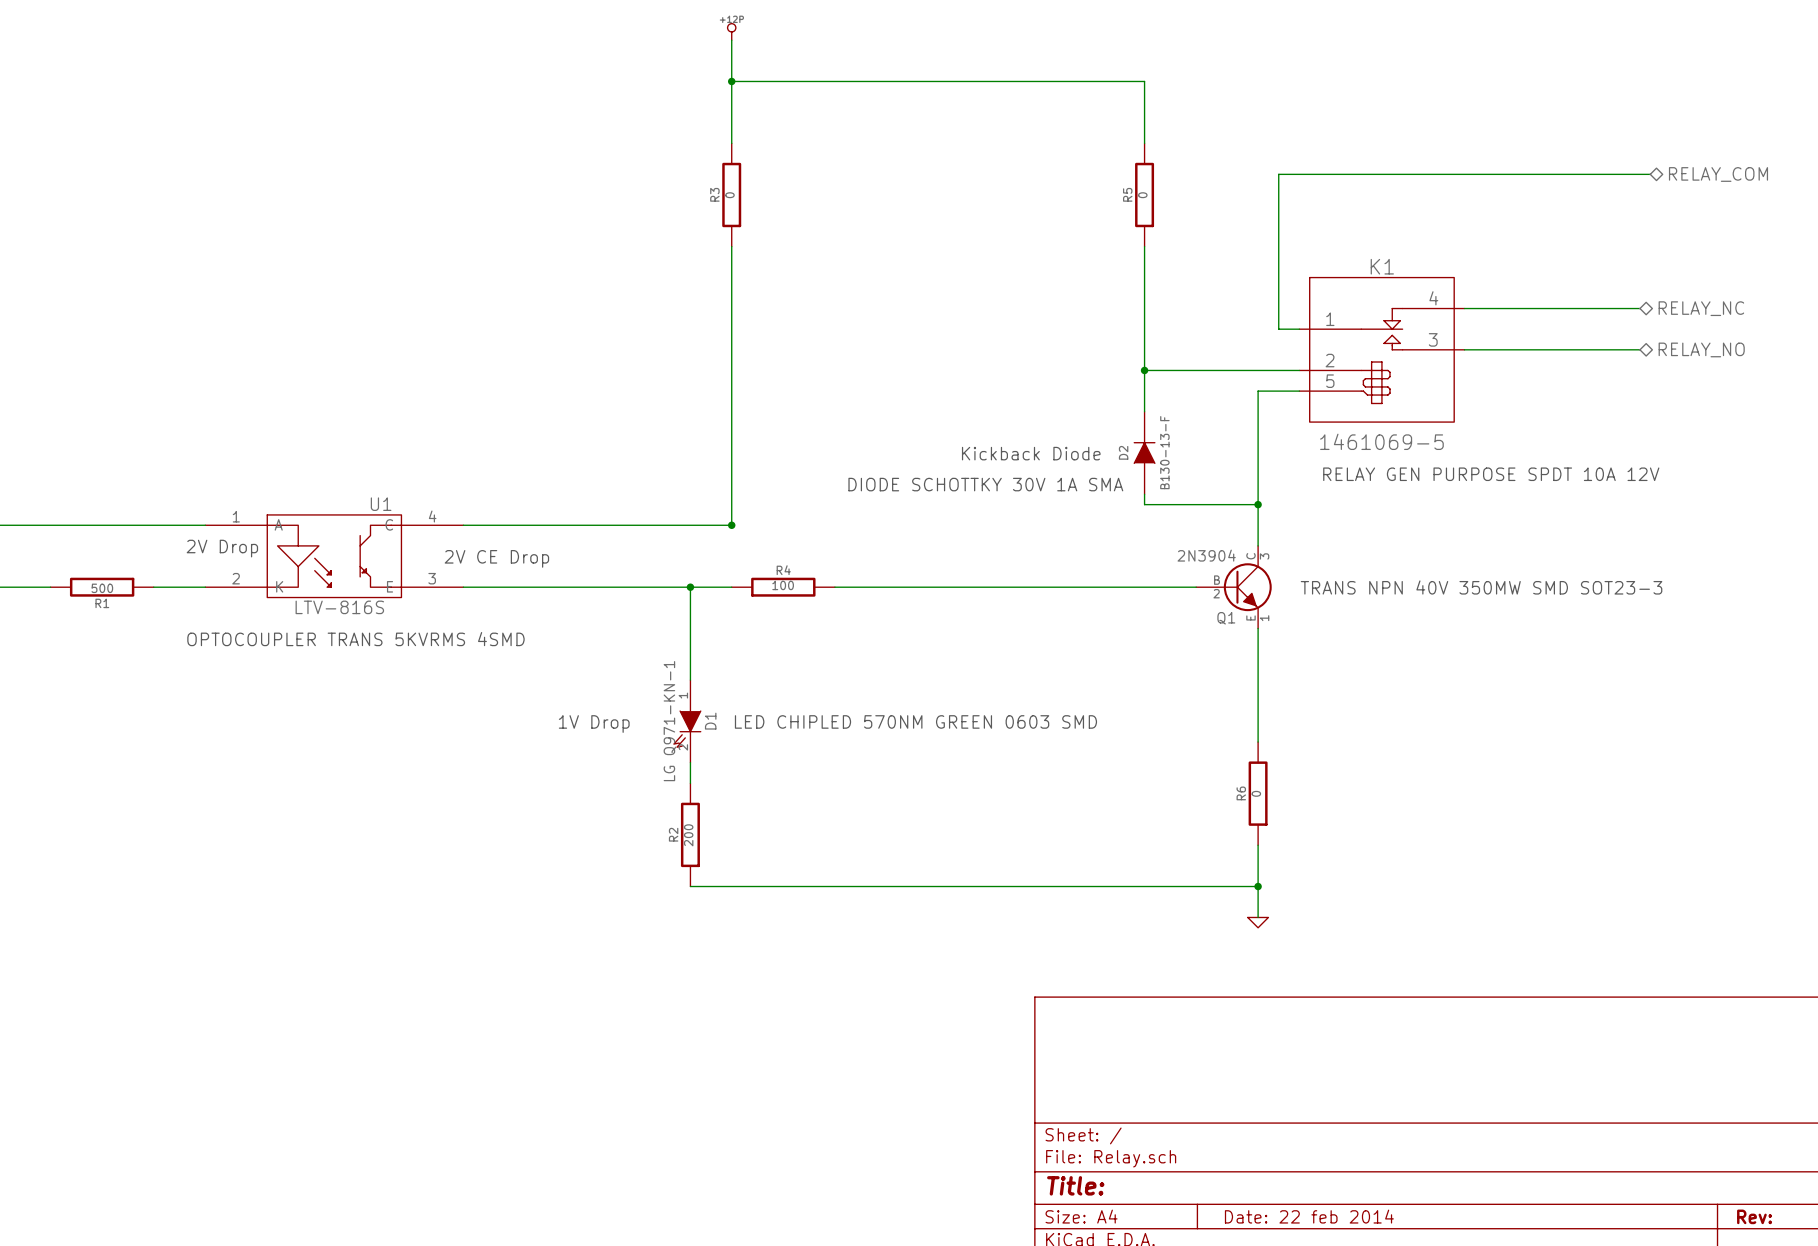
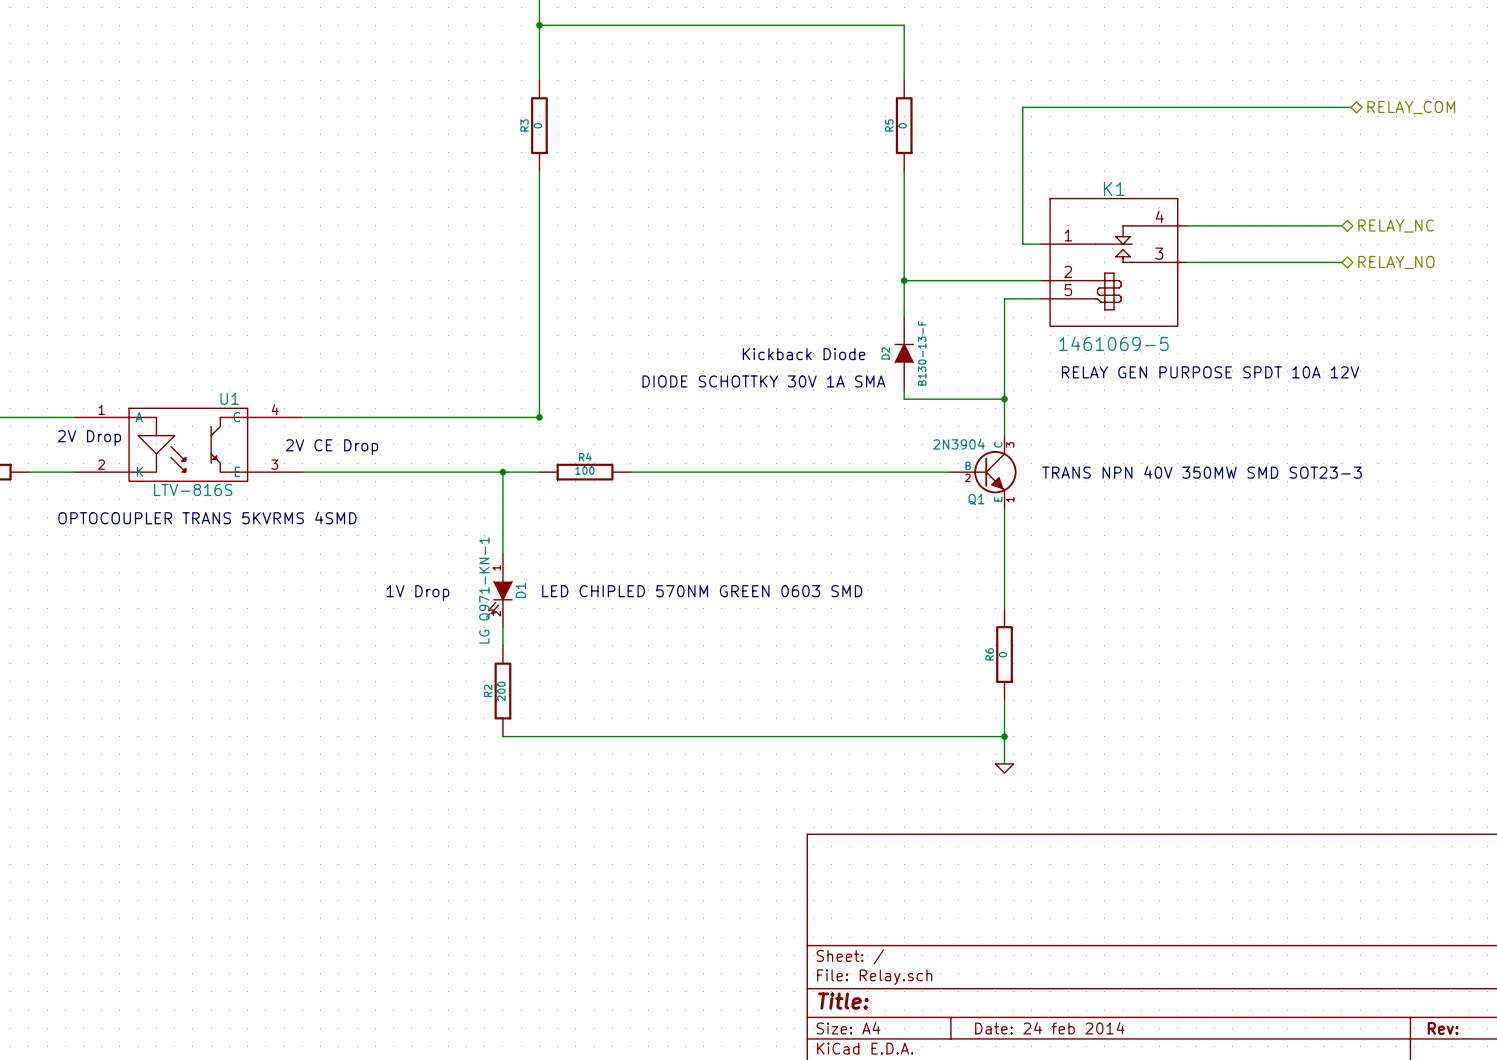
title block: Date: 22 feb 2014 (1309, 1216) -> Date: 24 feb 2014 (1049, 1028)

